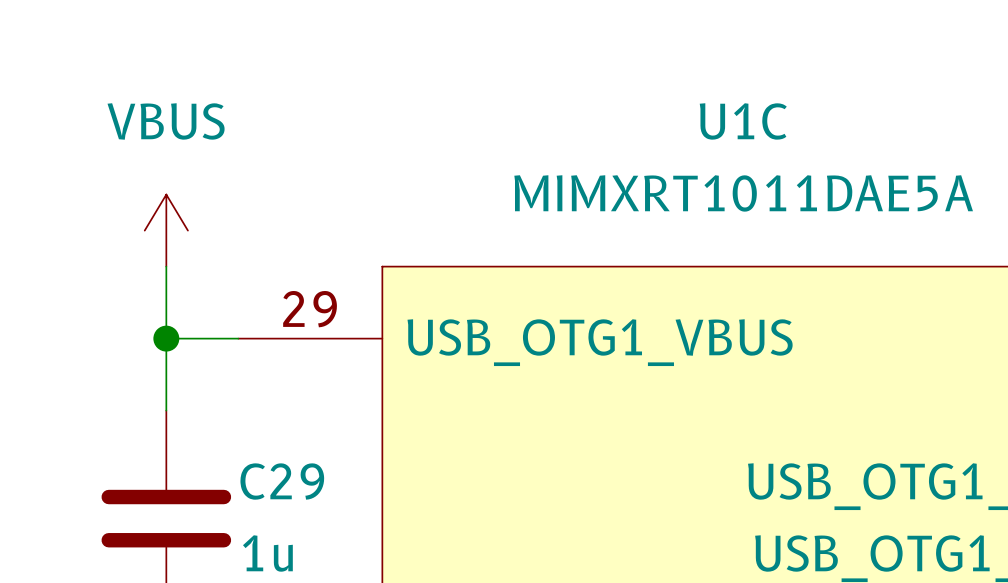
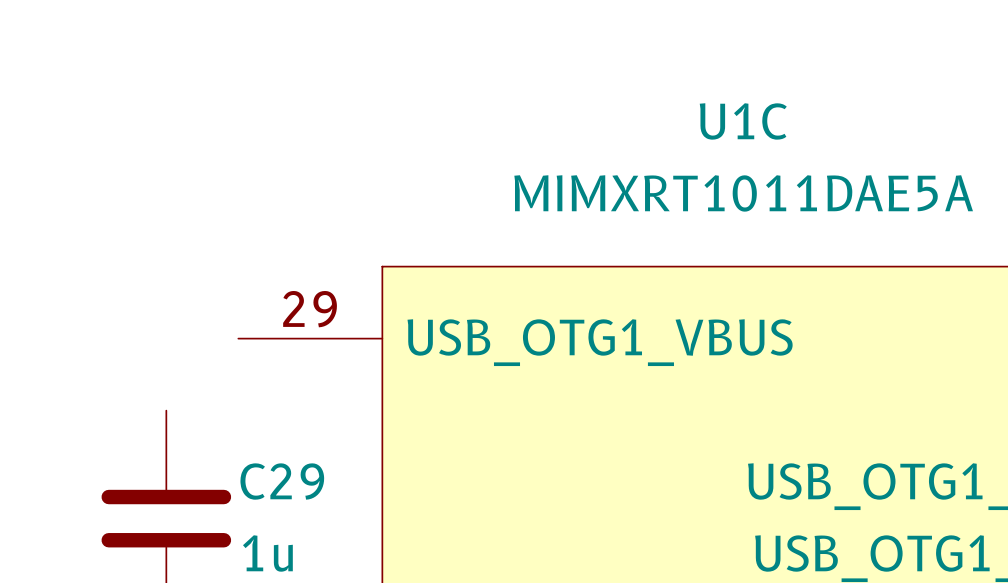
power symbol: VBUS (166, 230) -> none
wire: (166, 266) (166, 410) -> none
wire: (166, 338) (238, 338) -> none
junction: (166, 338) -> none

